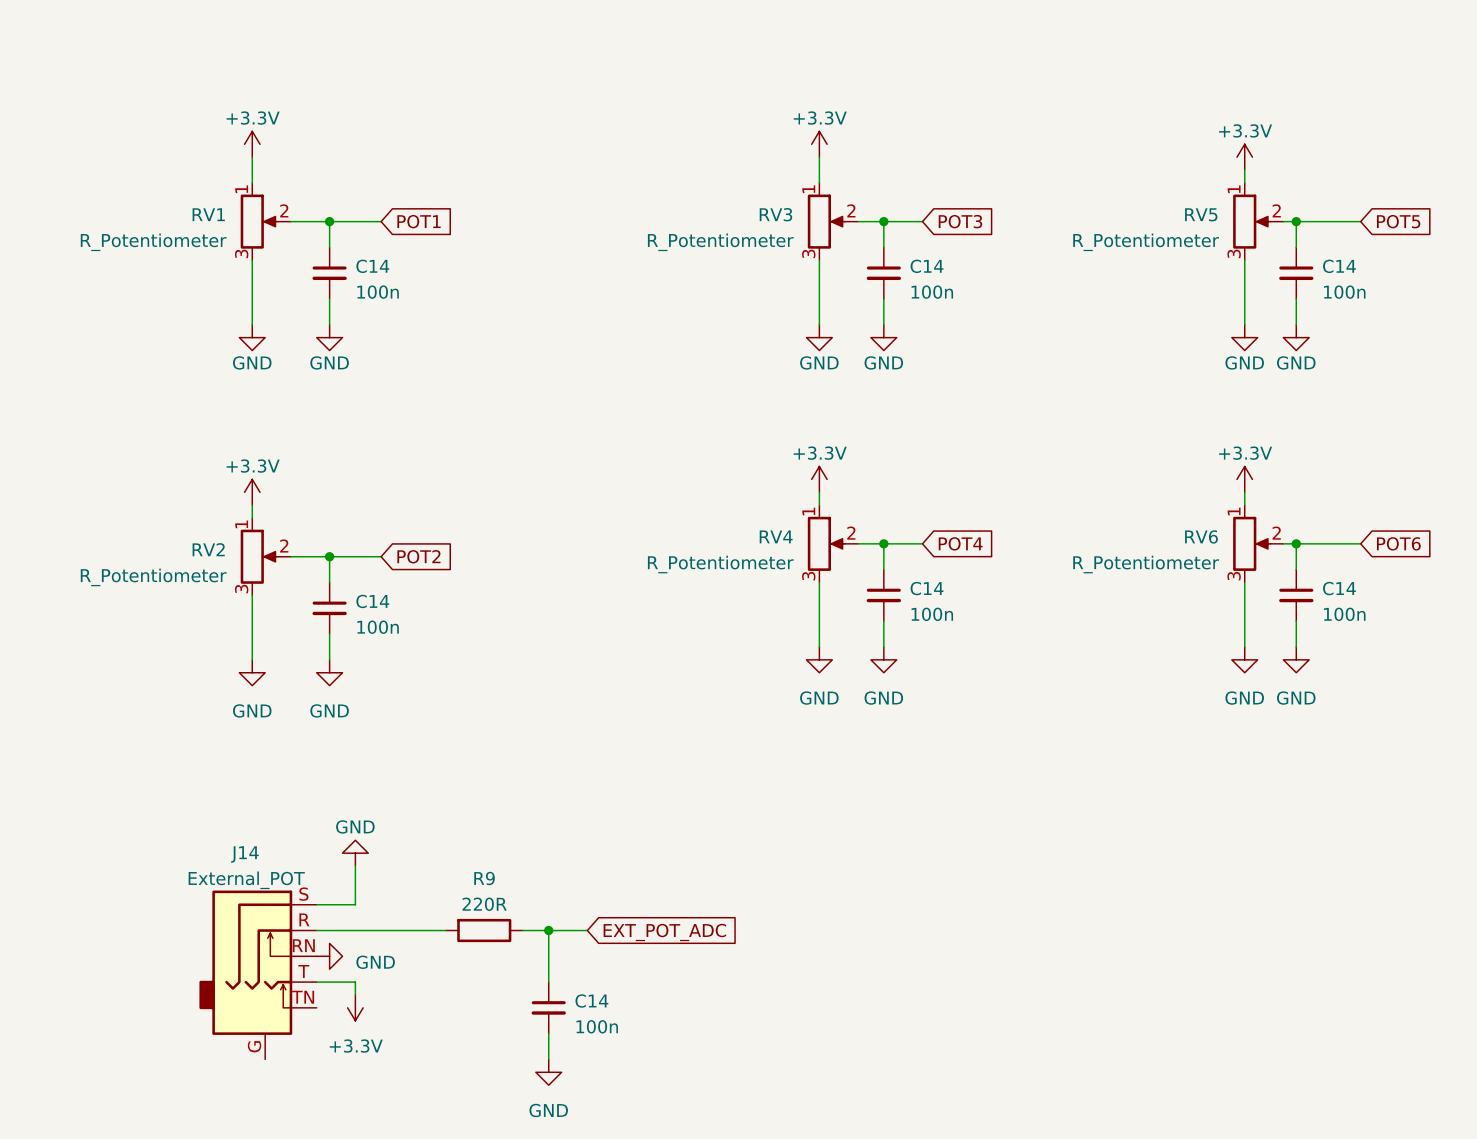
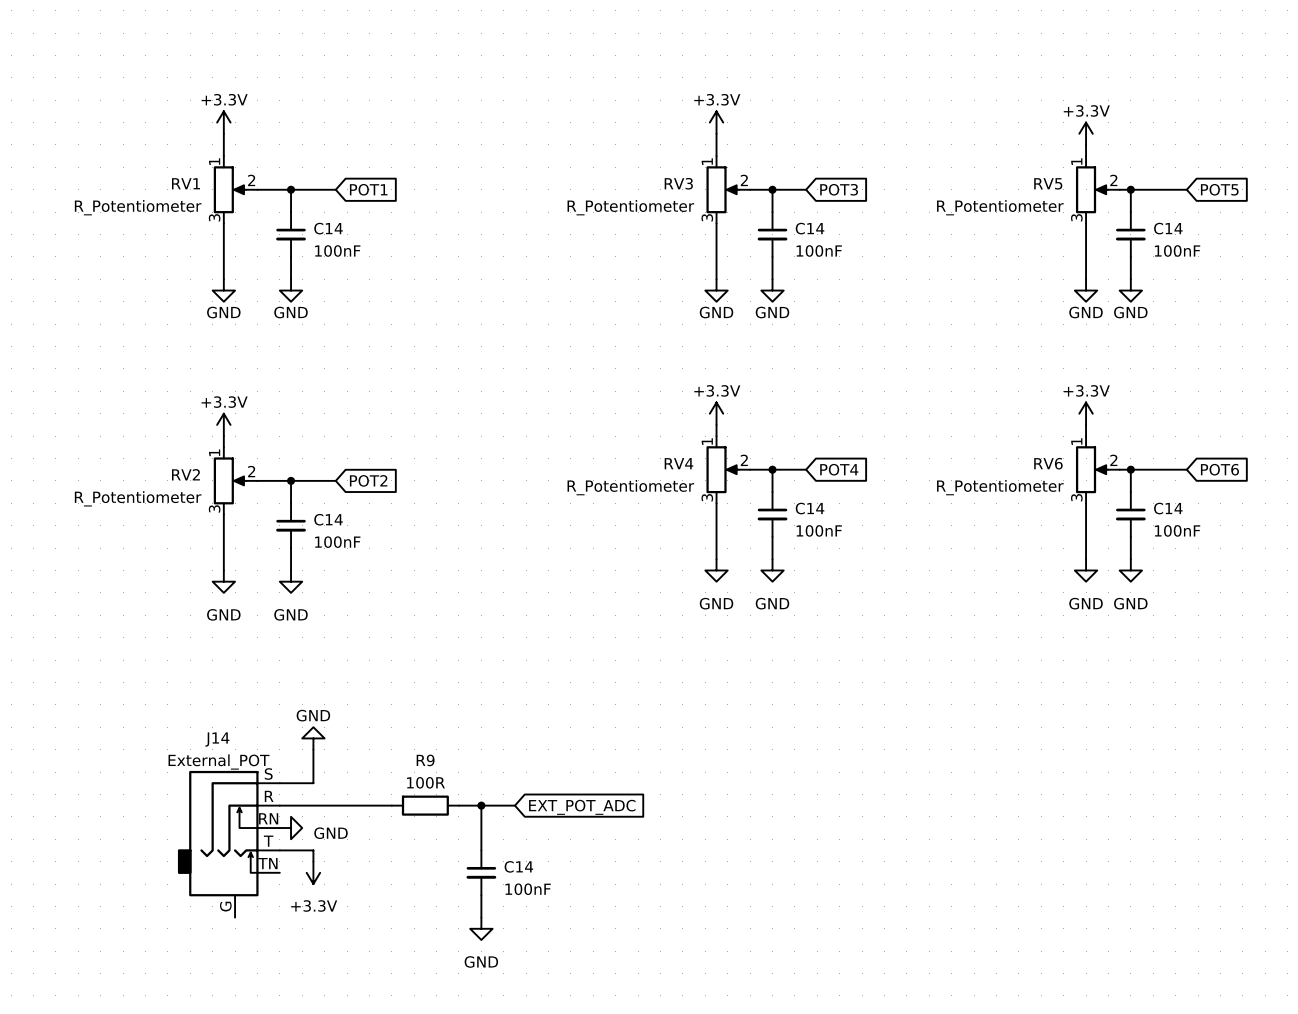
C14 value: 100n (378, 292) -> 100nF (337, 250)
C14 value: 100n (932, 292) -> 100nF (819, 250)
C14 value: 100n (1344, 292) -> 100nF (1177, 250)
C14 value: 100n (932, 614) -> 100nF (819, 530)
C14 value: 100n (1344, 614) -> 100nF (1177, 530)
C14 value: 100n (378, 627) -> 100nF (337, 542)
R9 value: 220R (484, 904) -> 100R (426, 782)
C14 value: 100n (597, 1026) -> 100nF (528, 889)

